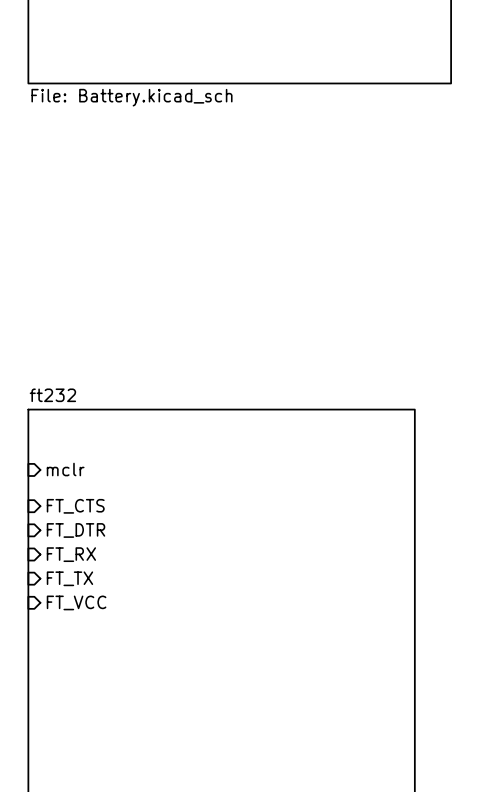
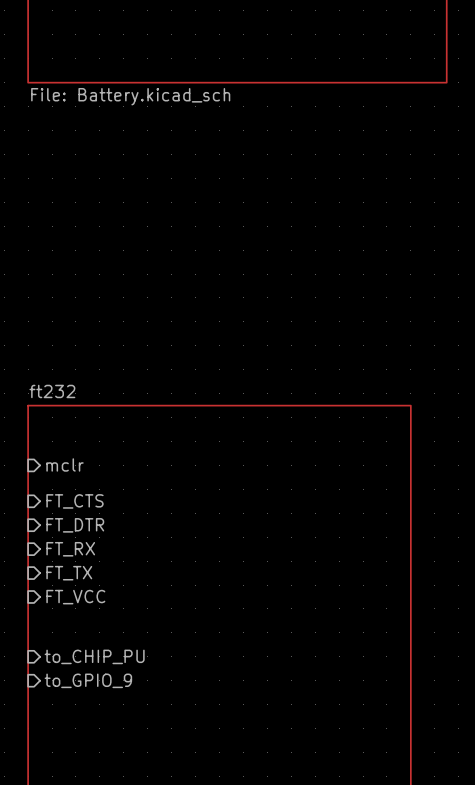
sheet pin: none -> to_CHIP_PU (94, 656)
sheet pin: none -> to_GPIO_9 (88, 680)

